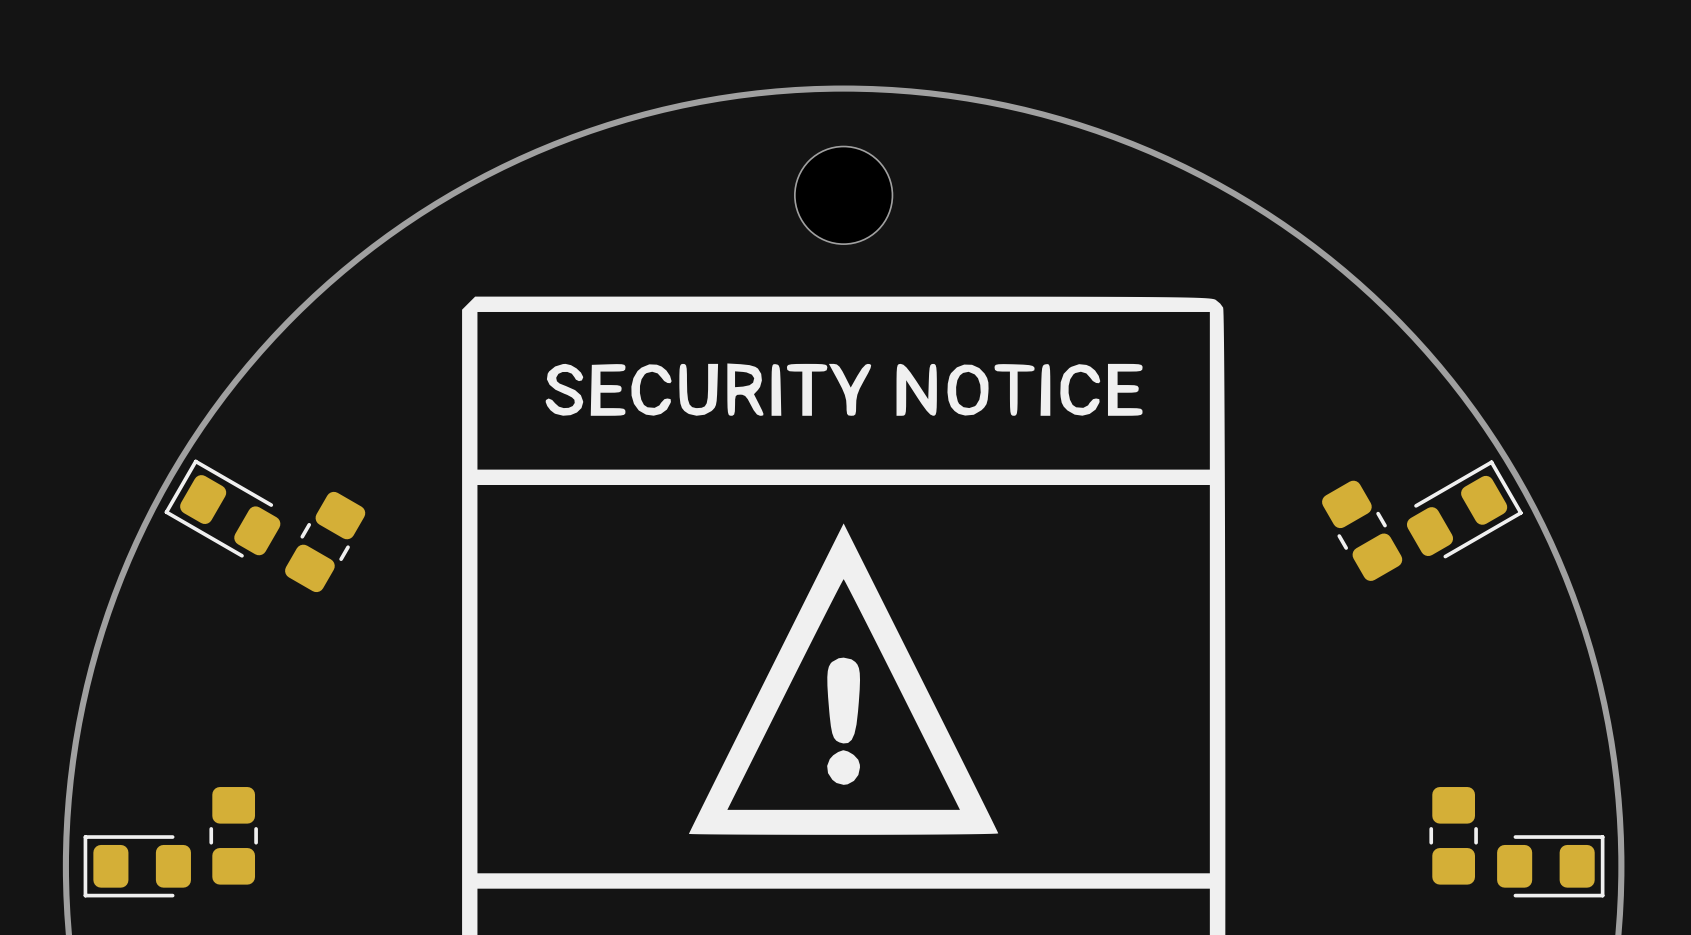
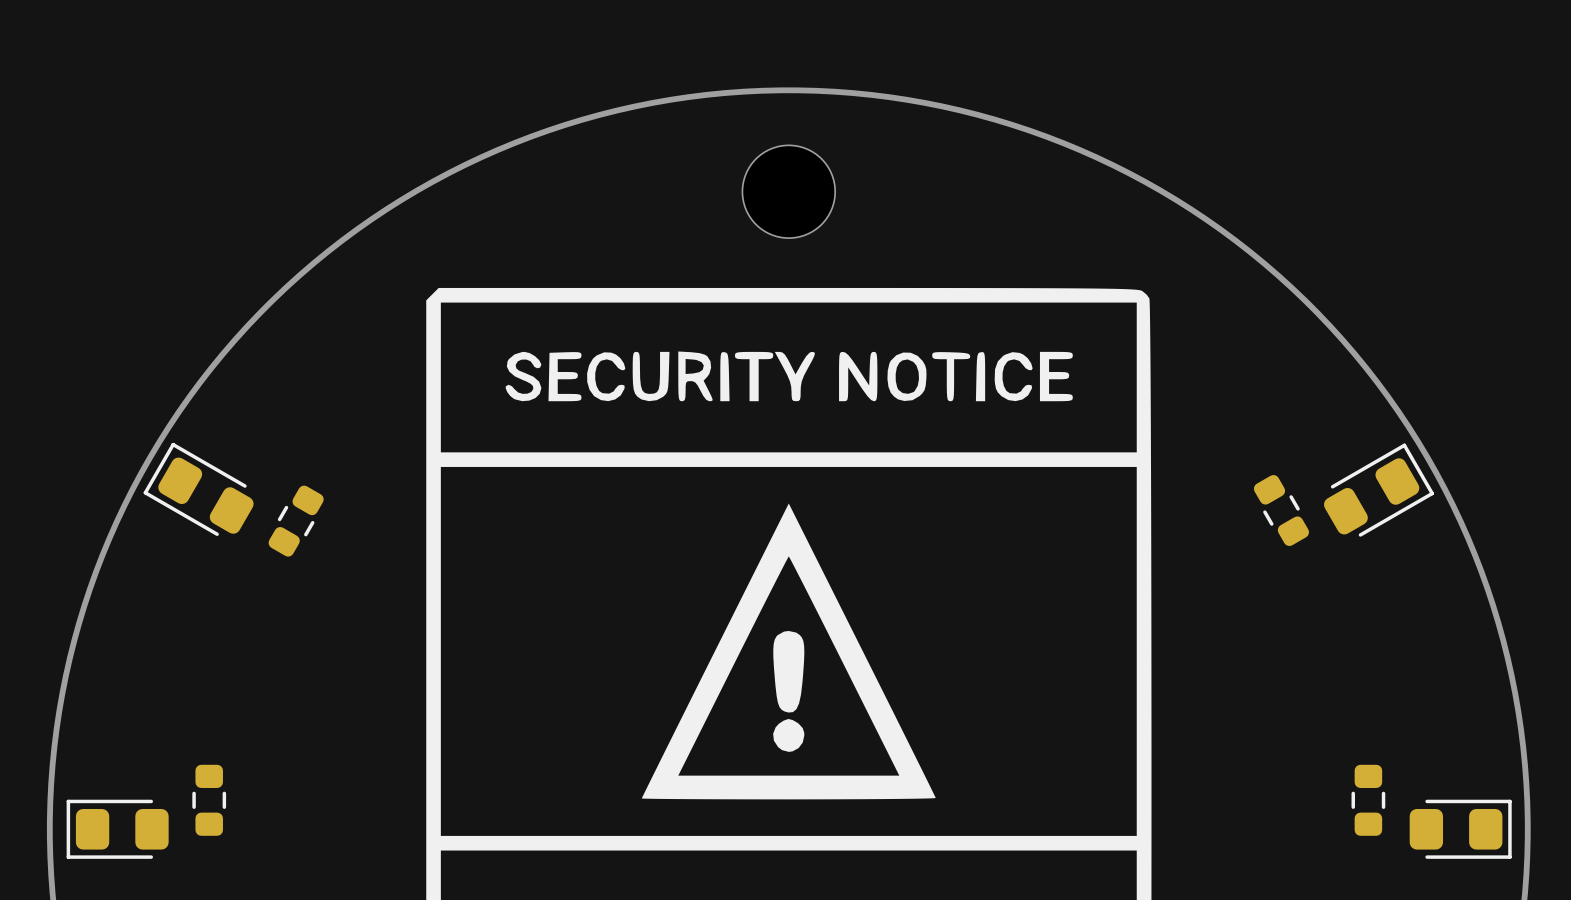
part footprint: [1322, 480, 1403, 581] -> [1253, 474, 1310, 547]
part footprint: [285, 491, 366, 593] -> [268, 485, 324, 557]
part footprint: [209, 787, 258, 885] -> [192, 764, 227, 836]
part footprint: [1429, 787, 1478, 885] -> [1351, 764, 1386, 836]

